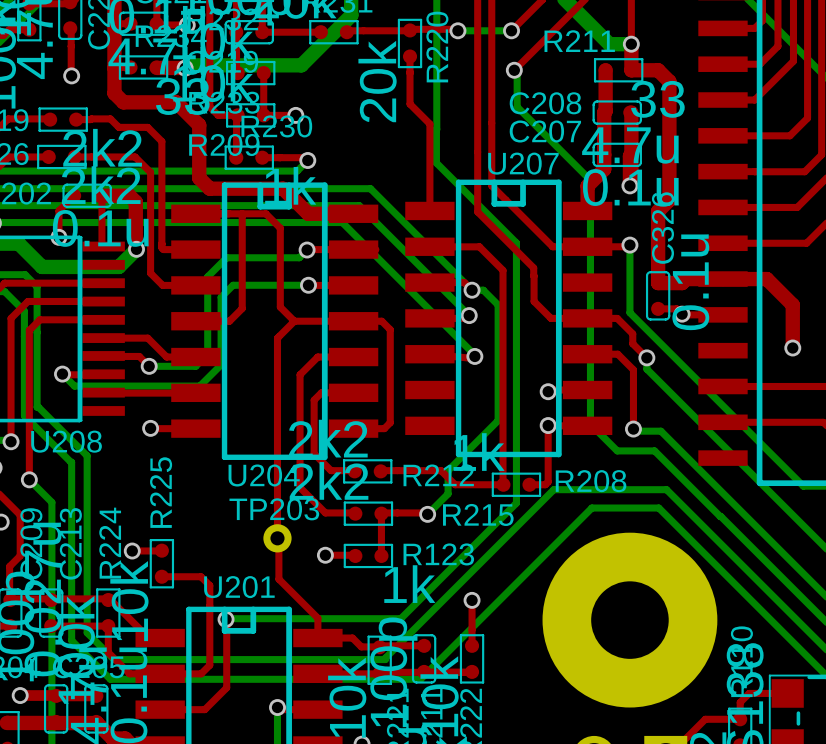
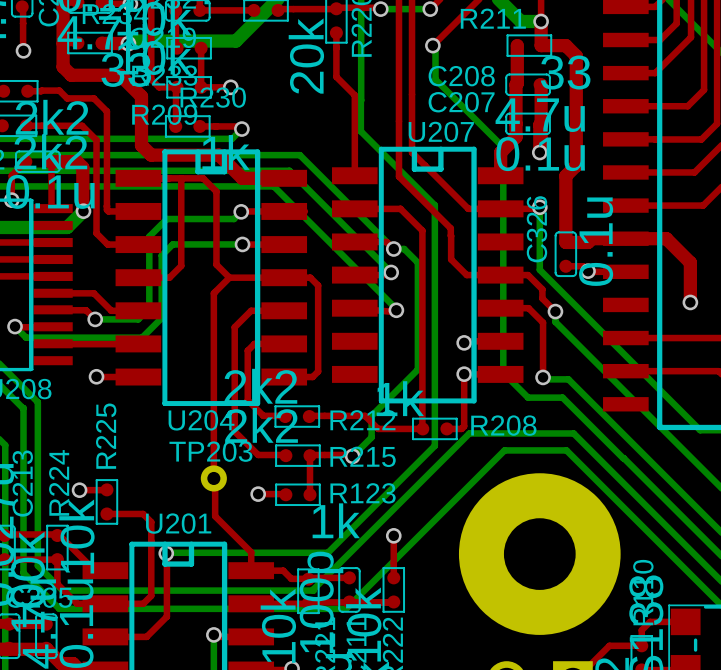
C326 name position: C326 (662, 228) -> C326 (536, 229)
R215 name position: R215 (478, 514) -> R215 (363, 456)

